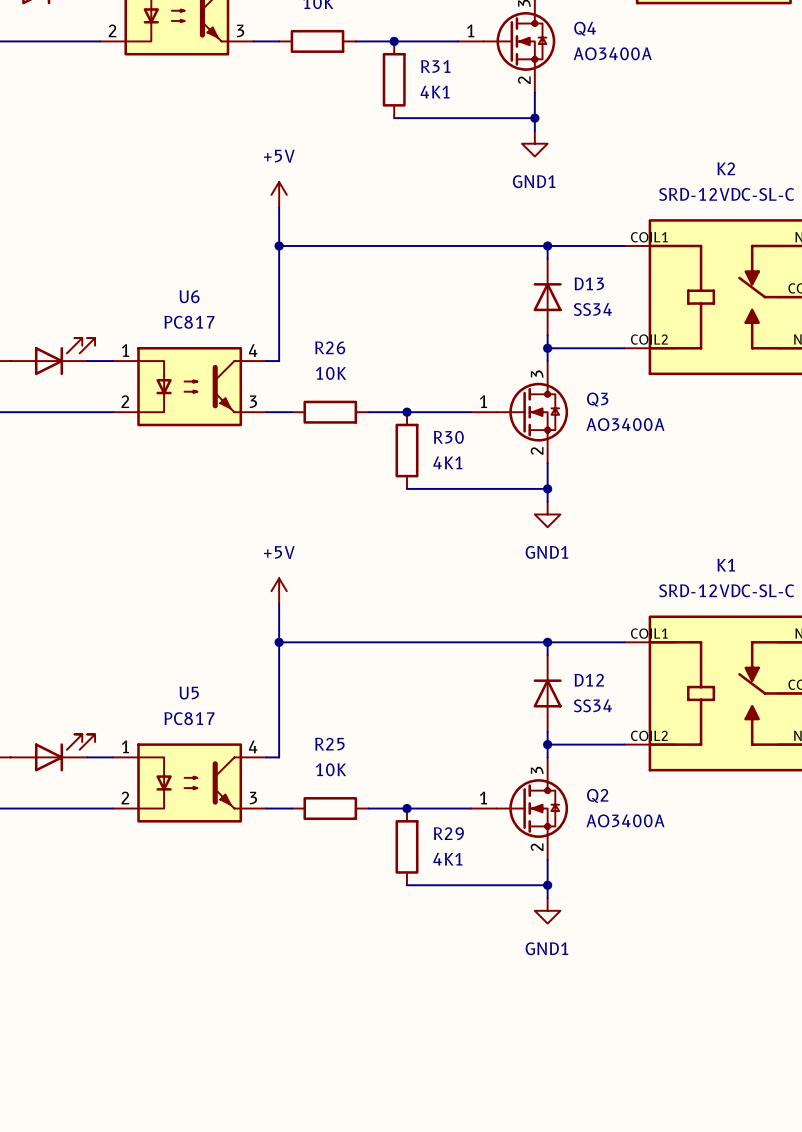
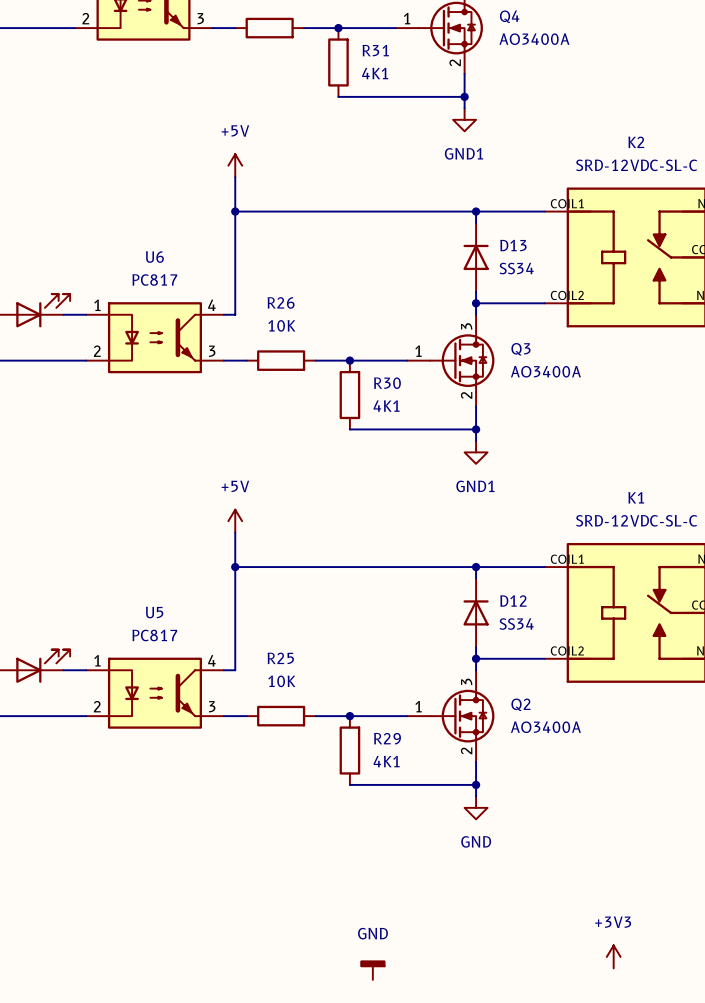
power symbol: GND1 (547, 910) -> GND (476, 807)
power symbol: none -> +3V3 (613, 956)
power symbol: none -> GND (372, 970)

